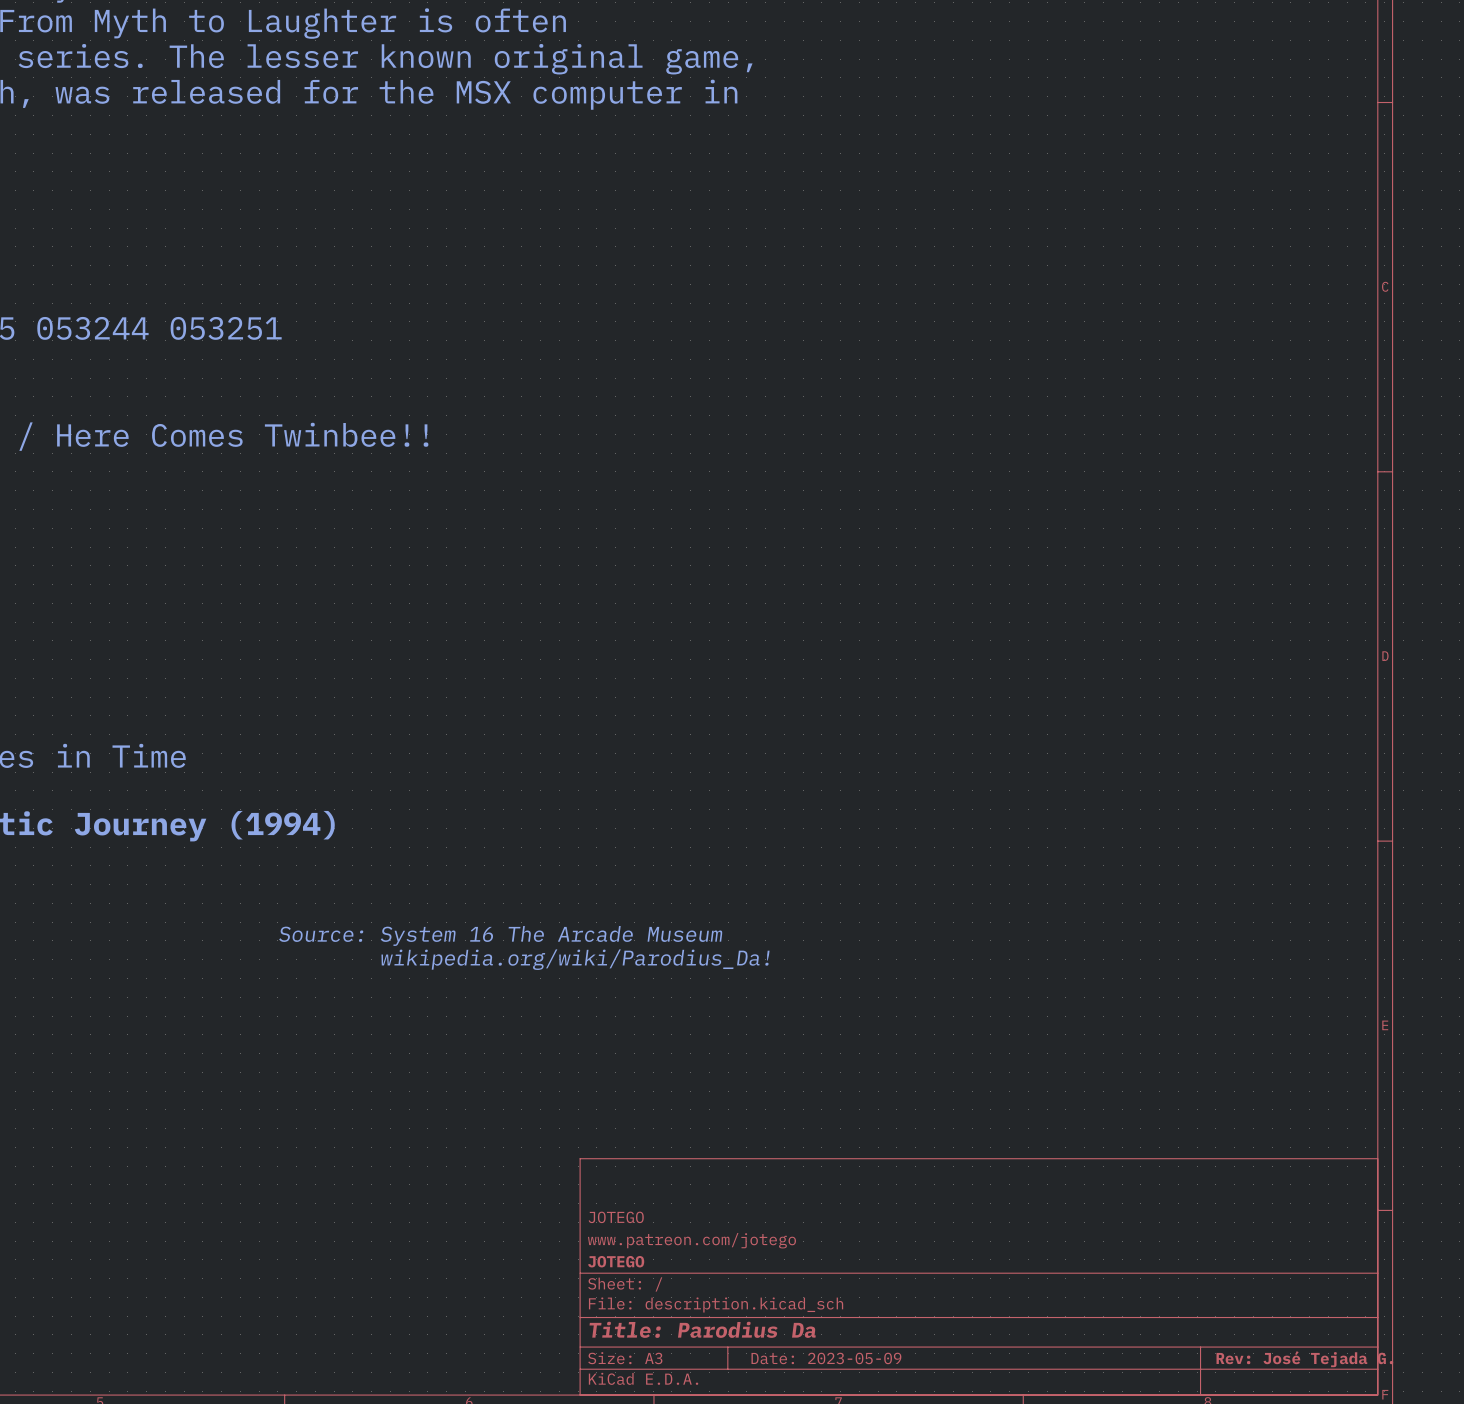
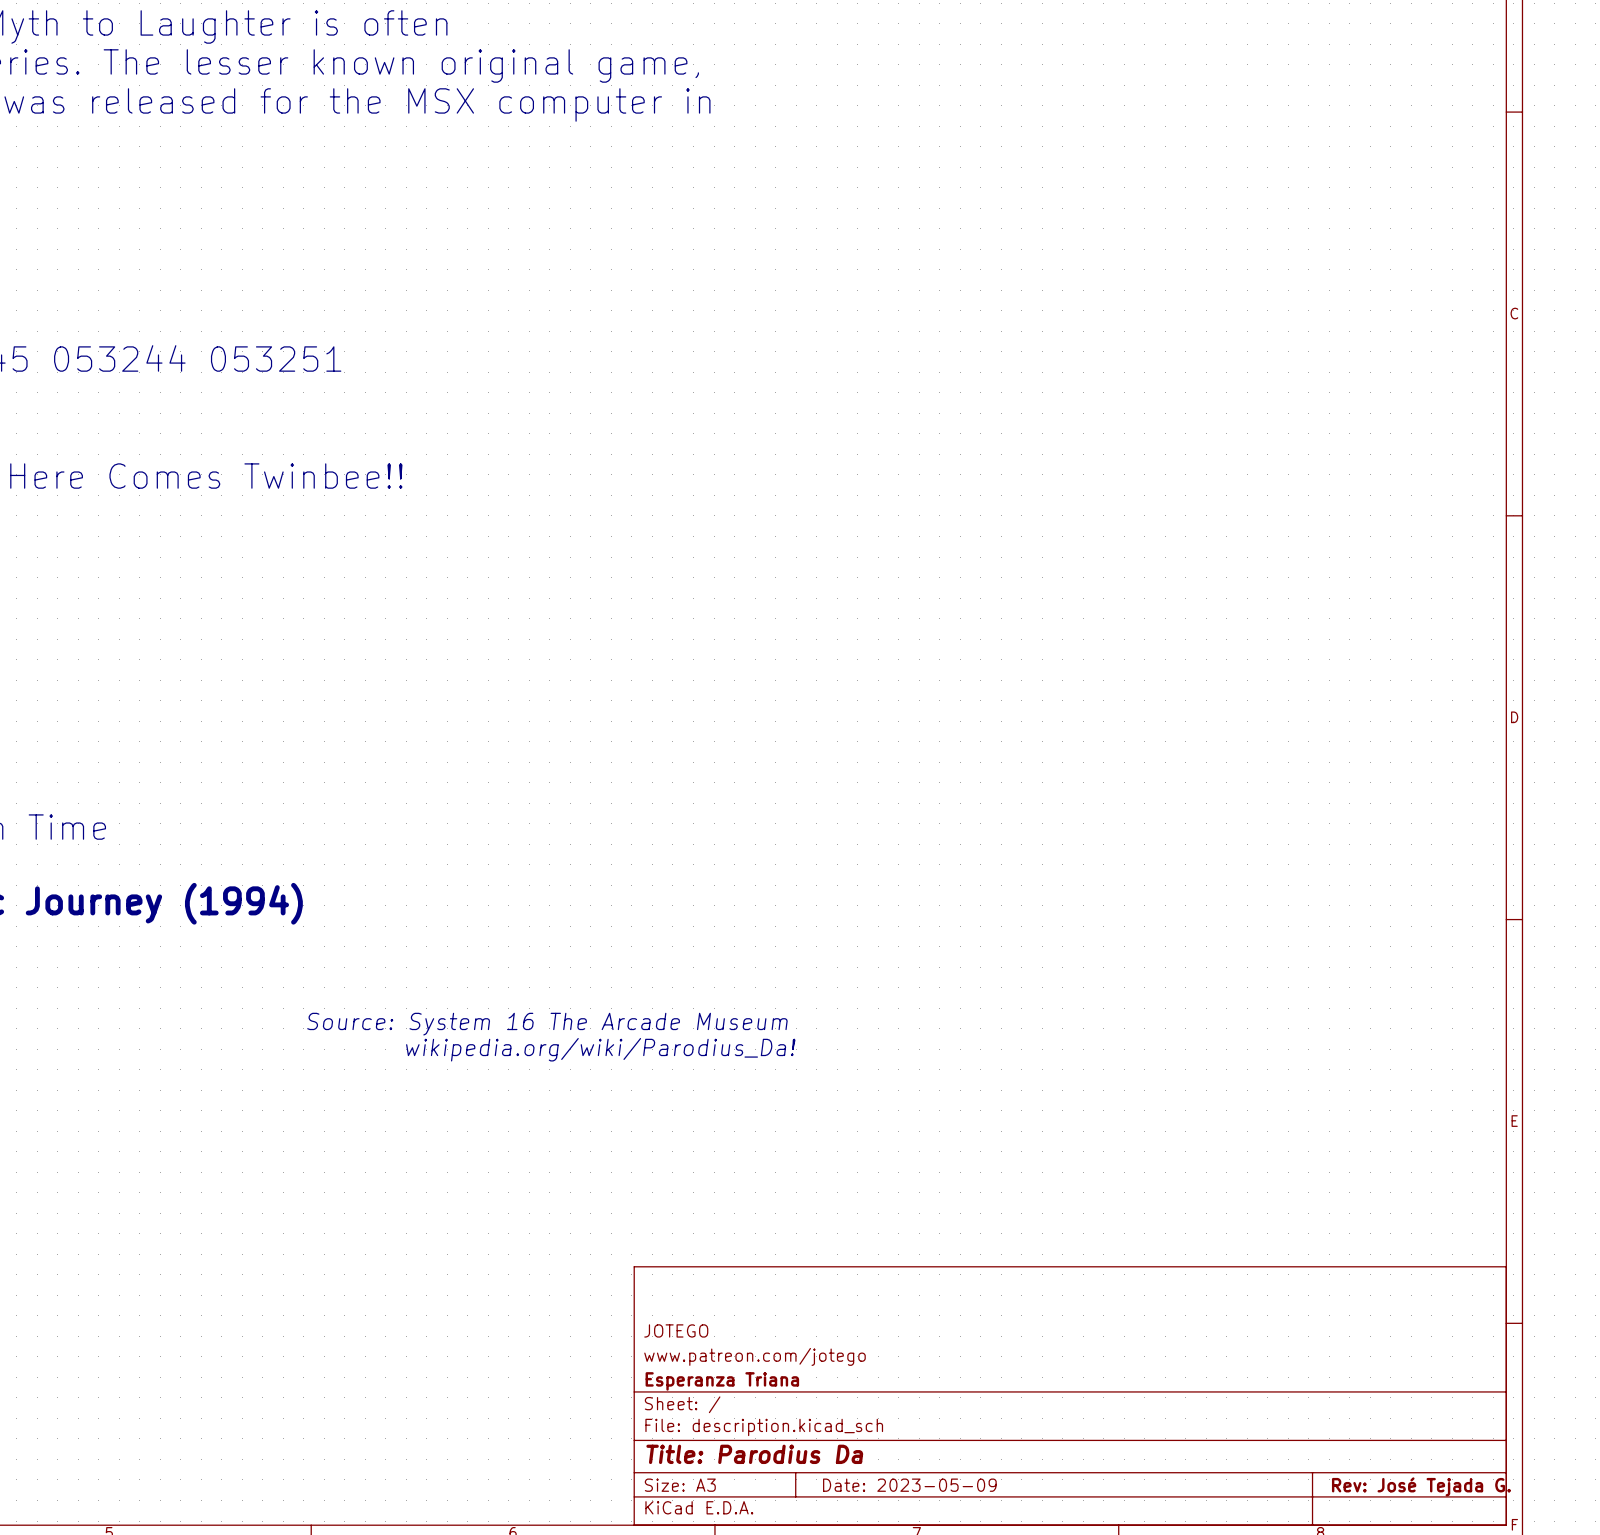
title block: JOTEGO (616, 1261) -> Esperanza Triana (722, 1381)

